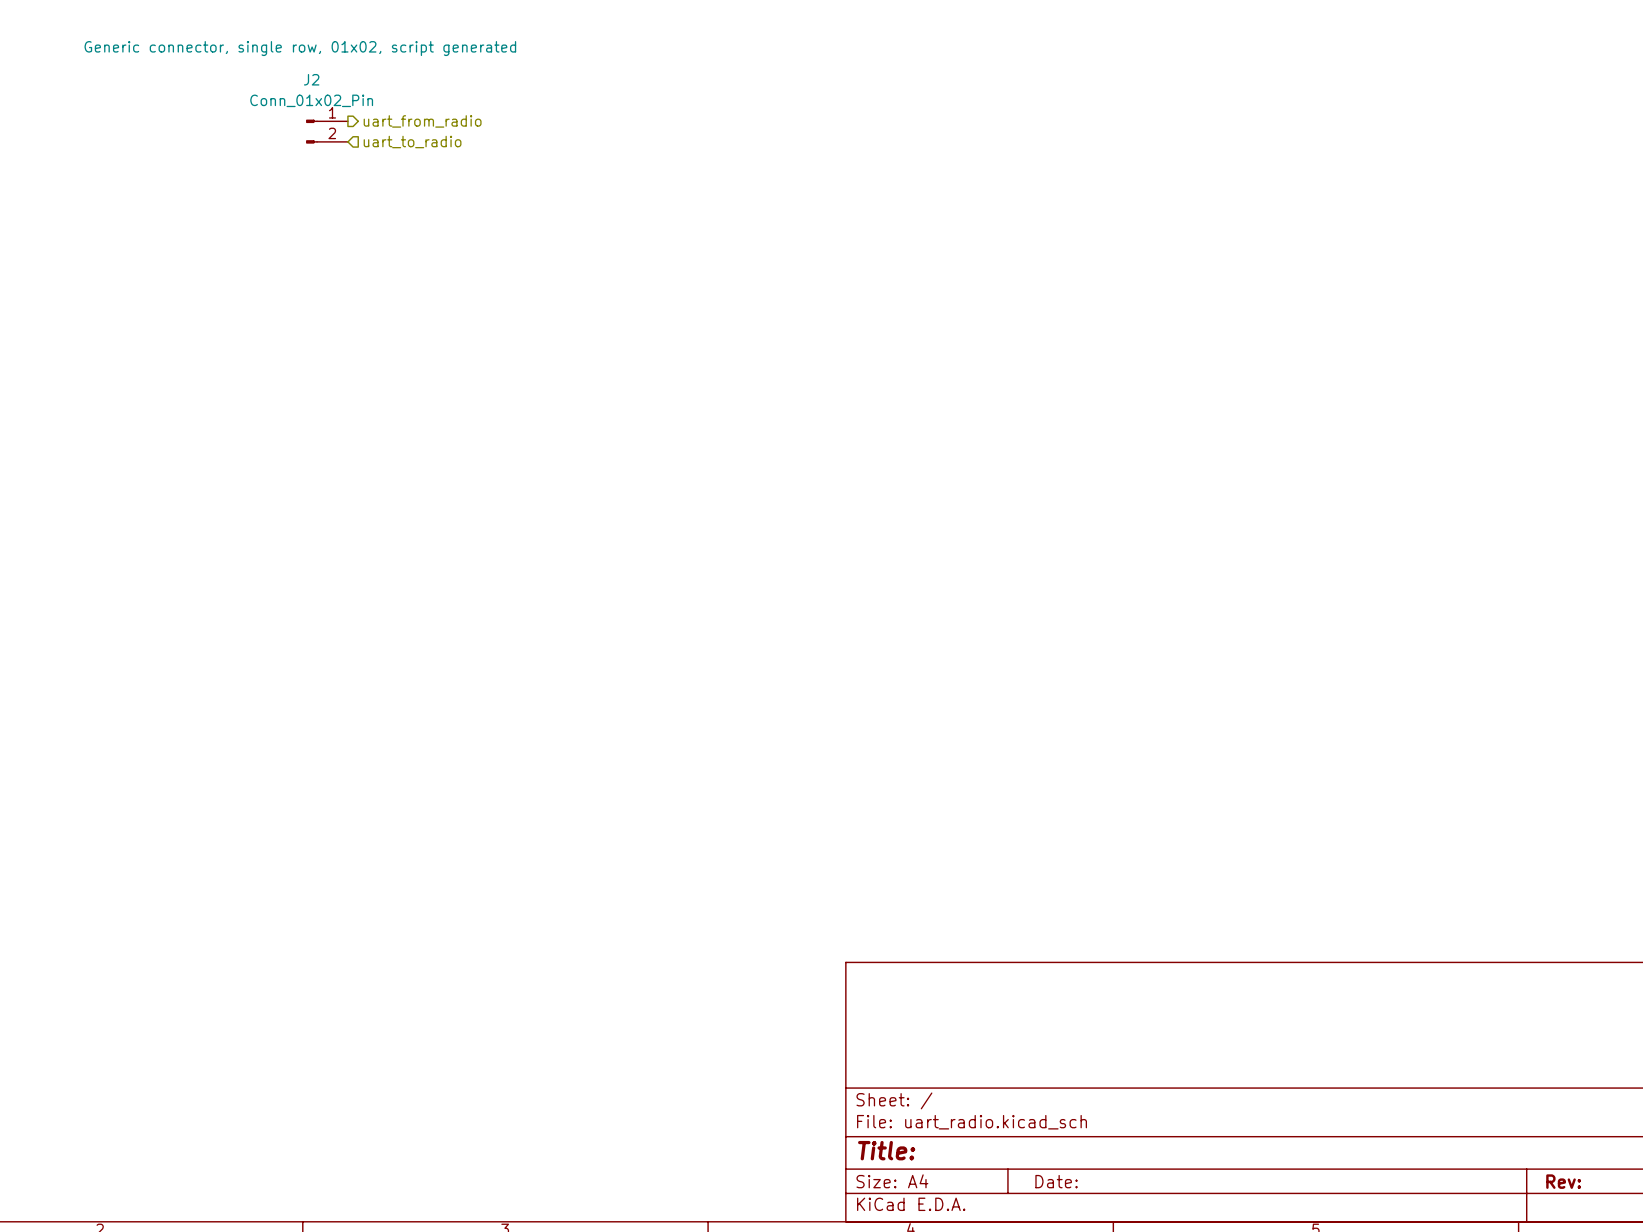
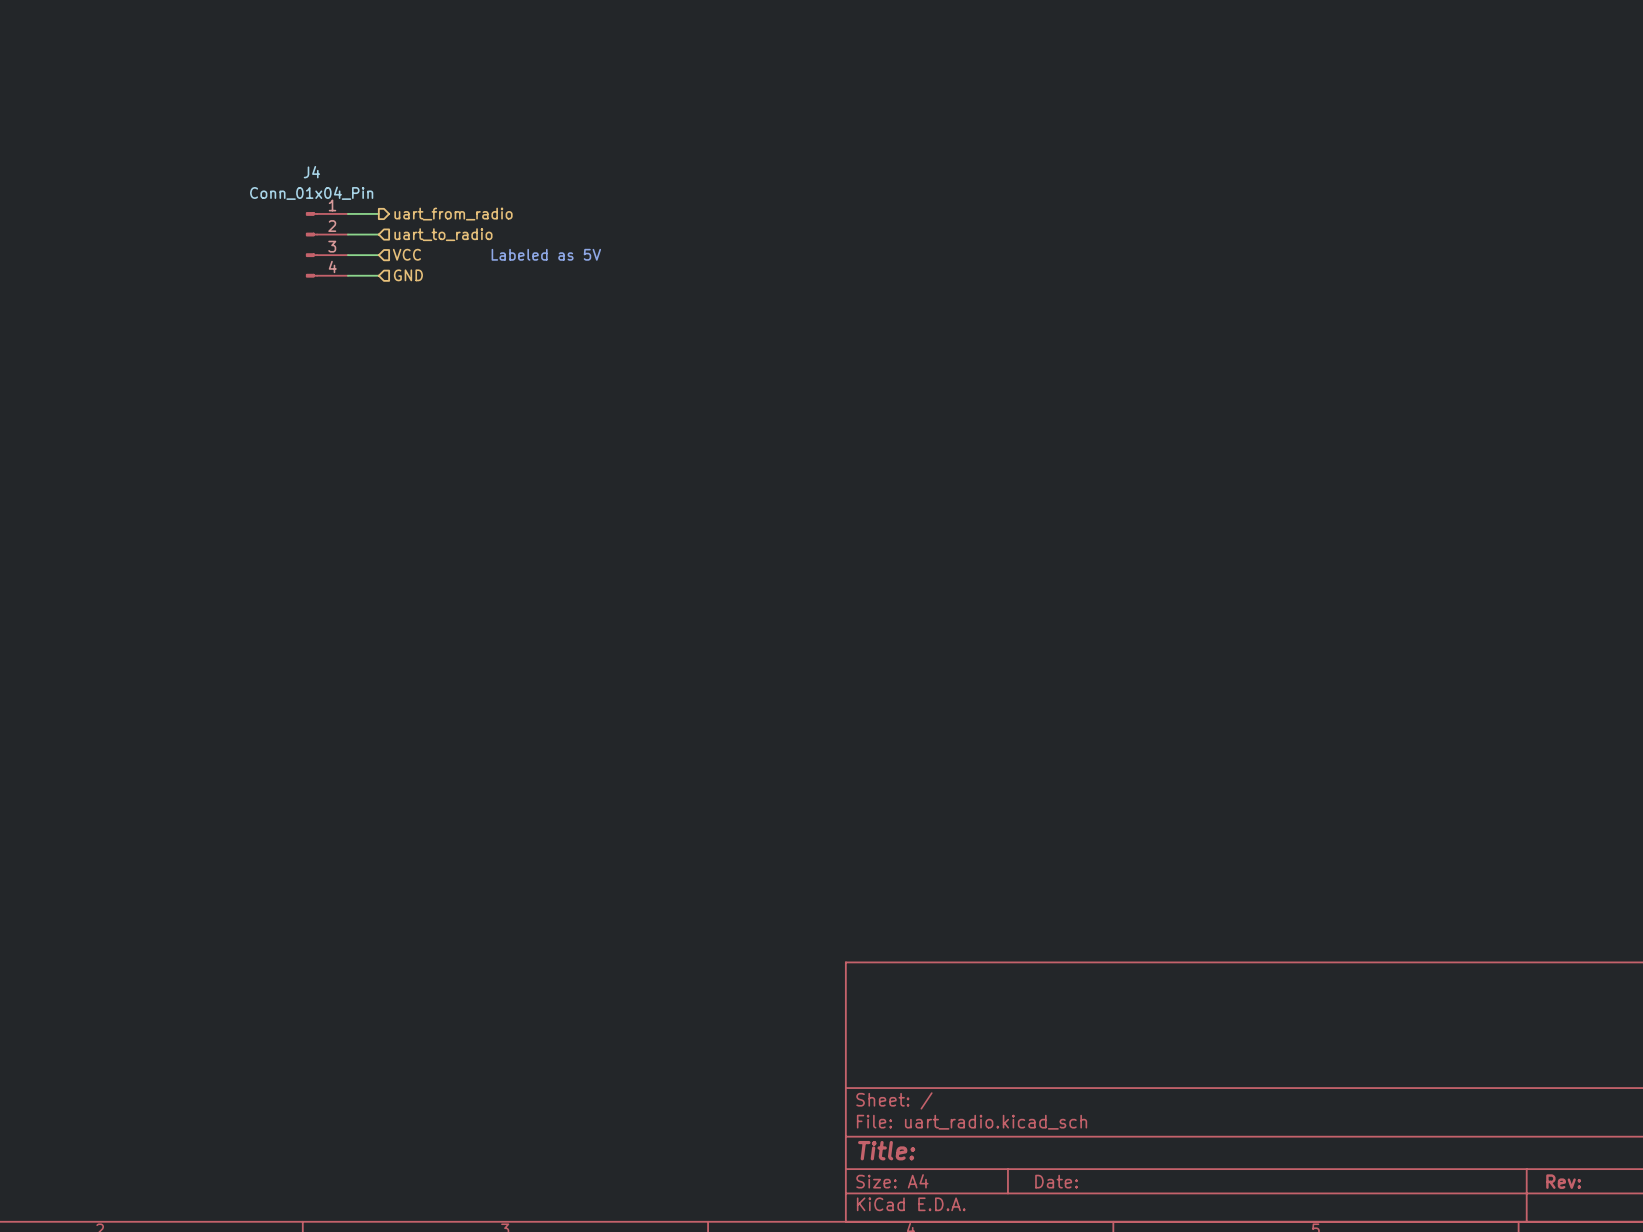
hierarchical label position: uart_from_radio (422, 121) -> uart_from_radio (453, 214)
J2: Conn_01x02_Pin (327, 131) -> none
hierarchical label position: uart_to_radio (412, 142) -> uart_to_radio (443, 234)
wire: none -> (347, 213) (378, 213)
wire: none -> (347, 234) (378, 234)
J4: none -> Conn_01x04_Pin (327, 244)
hierarchical label: none -> VCC (406, 254)
text: none -> Labeled as 5V (546, 254)
wire: none -> (347, 255) (378, 255)
wire: none -> (347, 275) (378, 275)
hierarchical label: none -> GND (408, 275)

